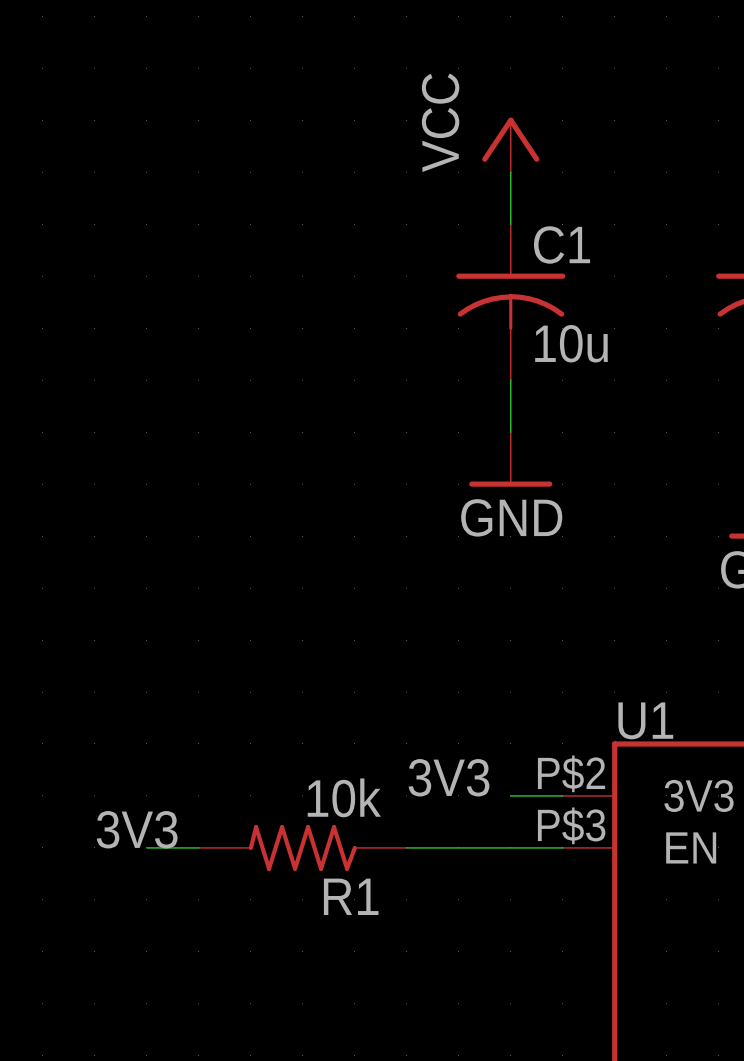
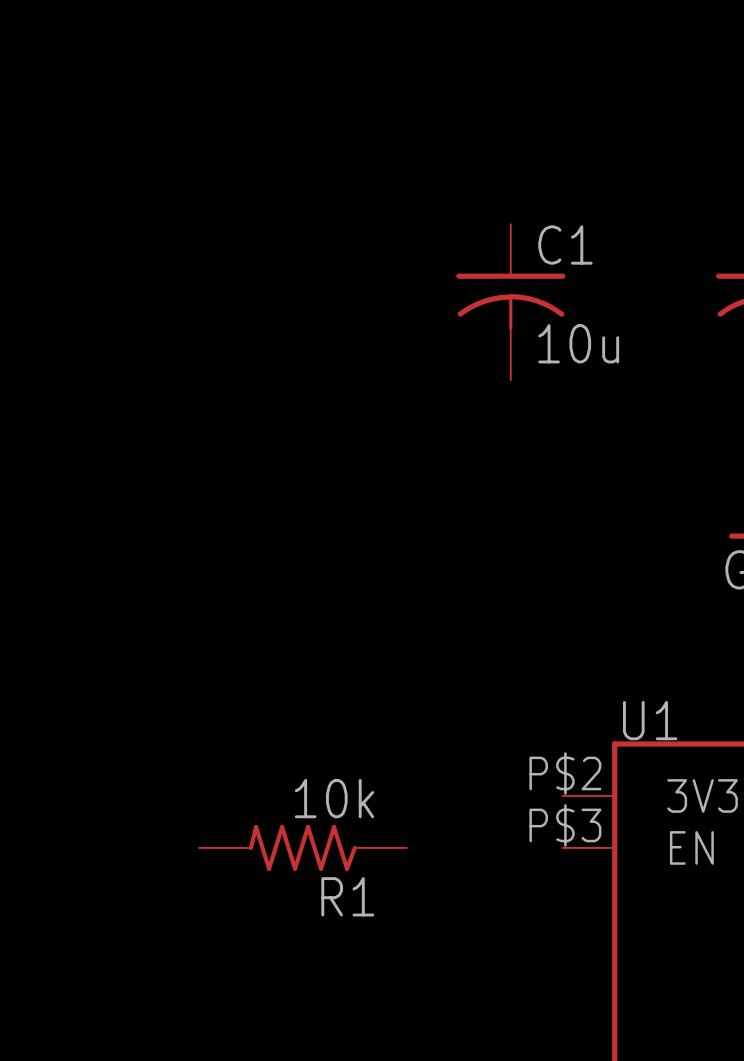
power symbol: VCC (510, 144) -> none
wire: (510, 172) (510, 224) -> none
wire: (510, 380) (510, 432) -> none
power symbol: GND (510, 459) -> none
label: 3V3 (449, 777) -> none
wire: (510, 795) (562, 795) -> none
label: 3V3 (137, 829) -> none
wire: (146, 847) (198, 847) -> none
wire: (406, 847) (562, 847) -> none

